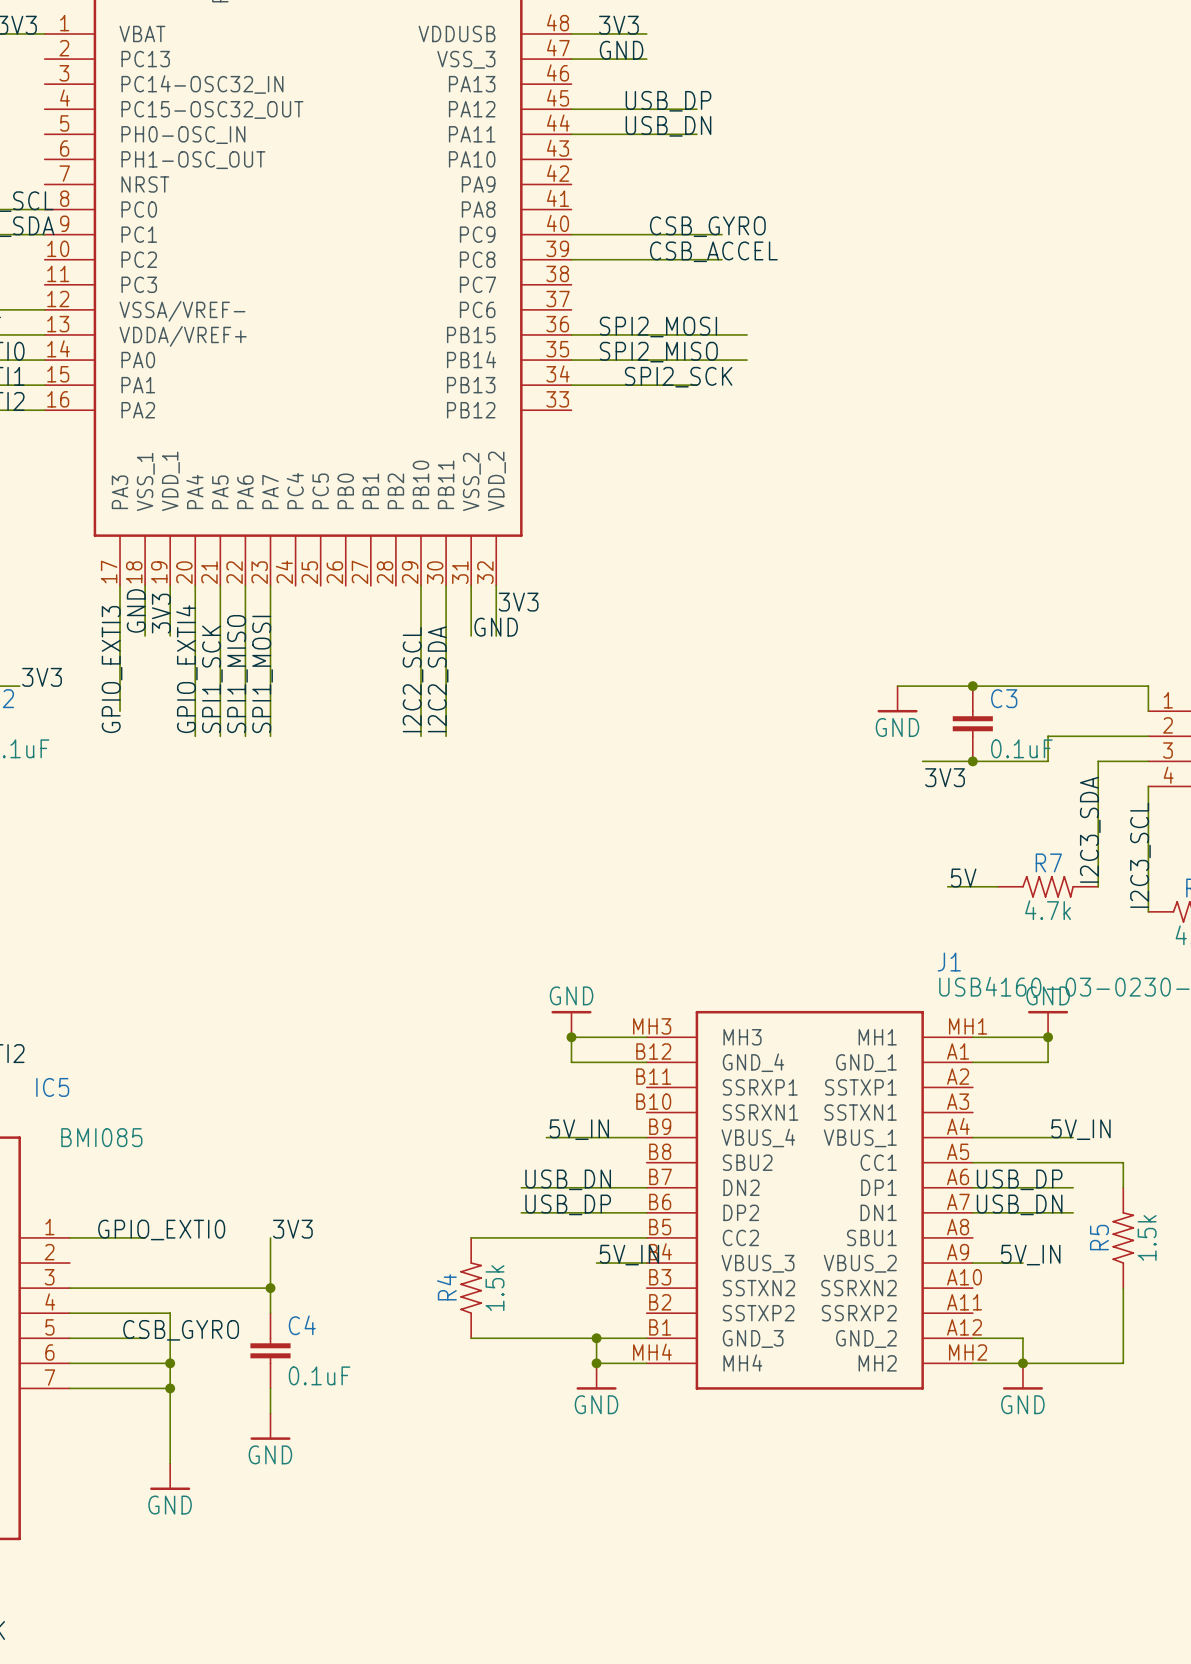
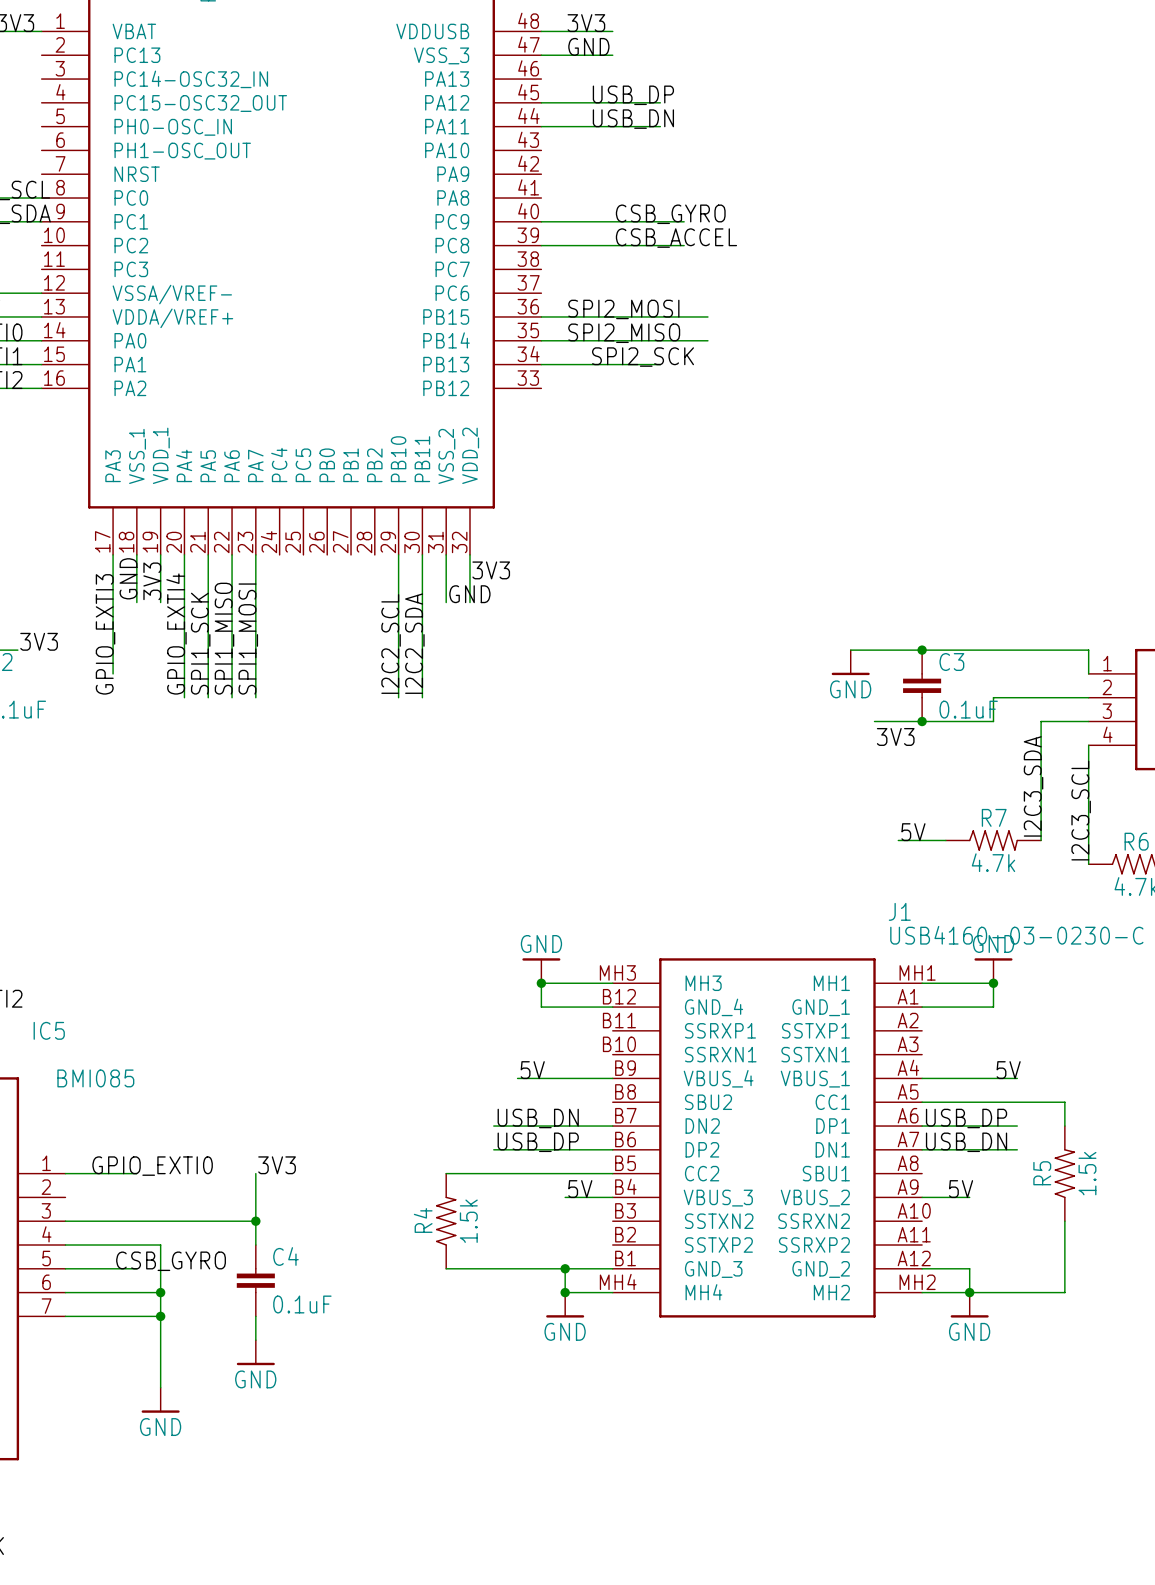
label: 5V_IN (579, 1129) -> 5V (532, 1070)
label: 5V_IN (1080, 1129) -> 5V (1008, 1070)
label: 5V_IN (629, 1255) -> 5V (580, 1189)
label: 5V_IN (1030, 1255) -> 5V (961, 1189)

